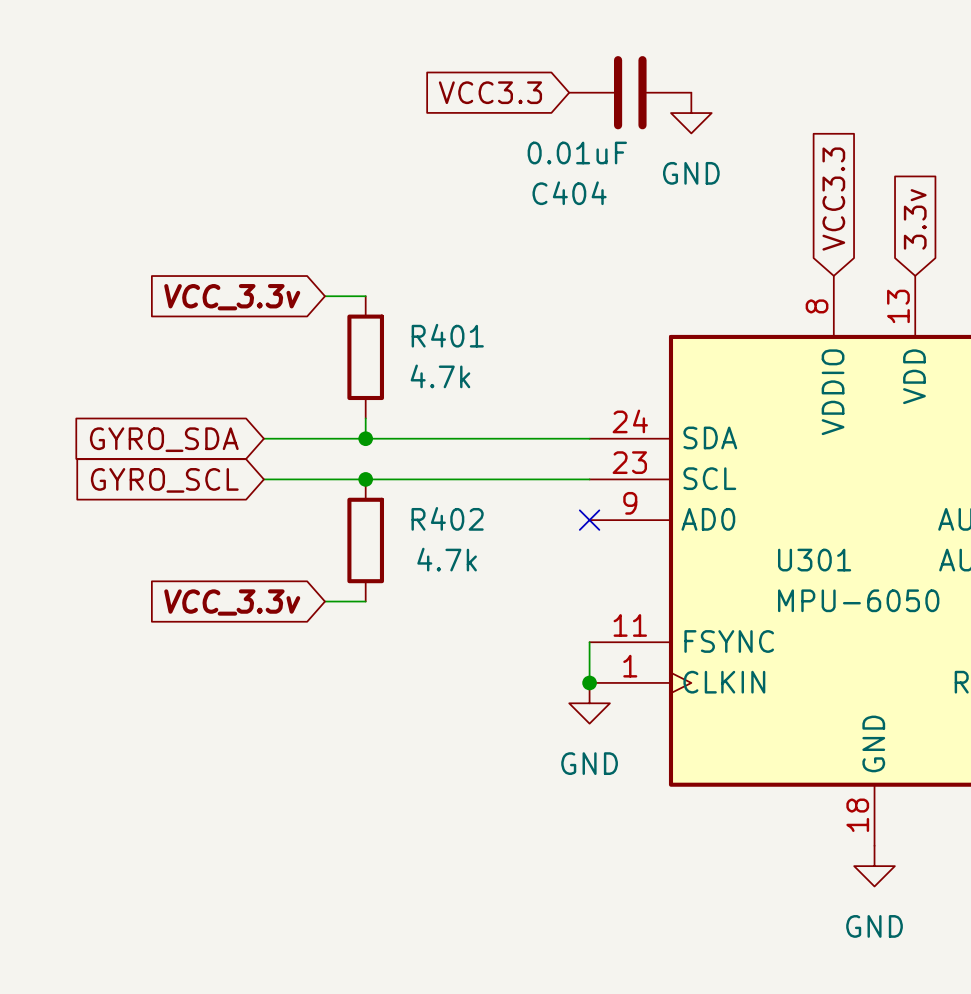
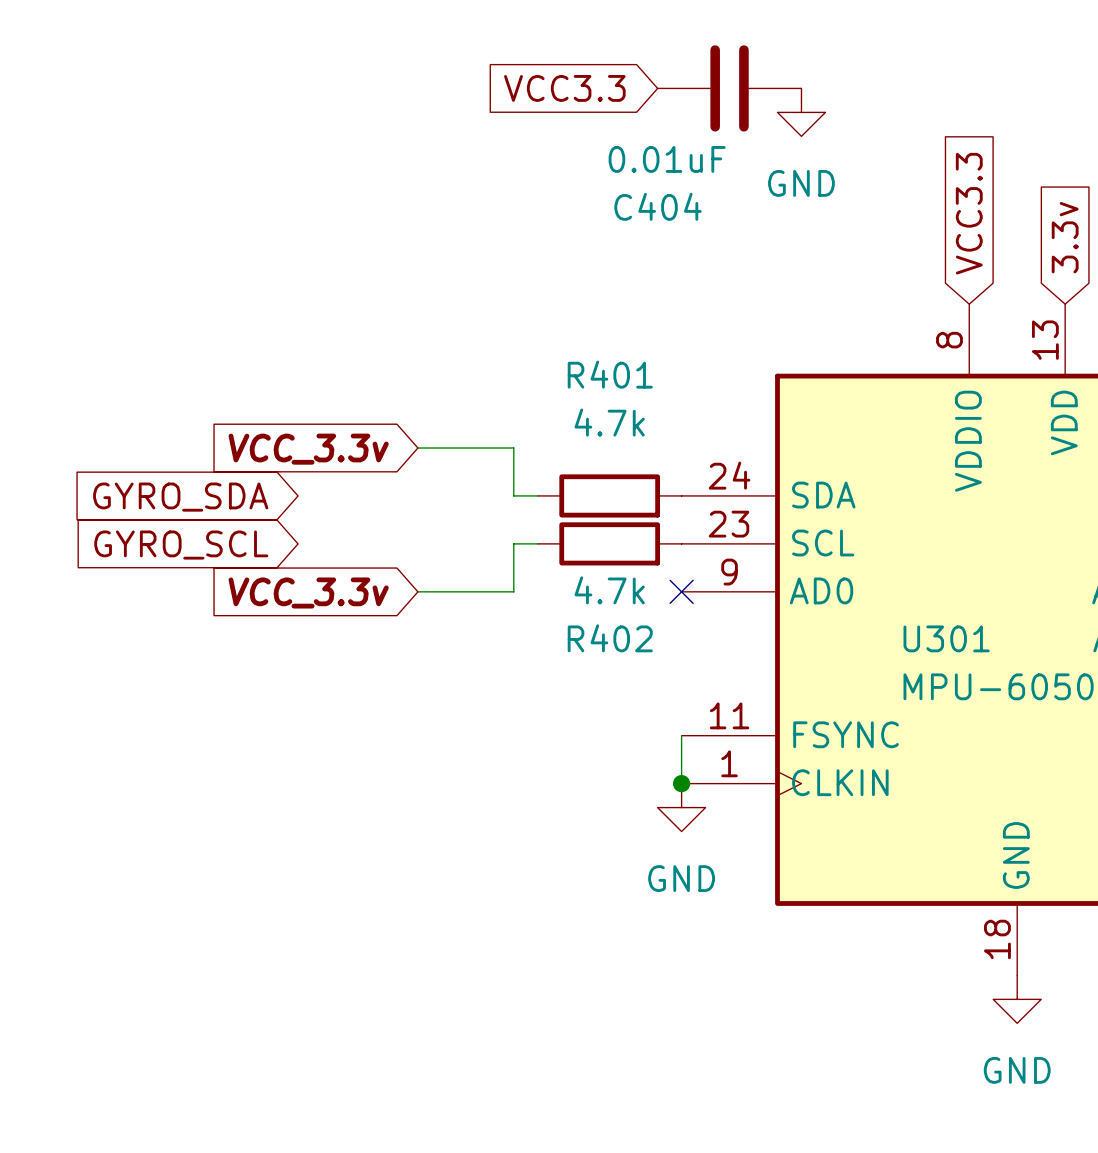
wire: (324, 296) (365, 296) -> none
global label: VCC_3.3v (232, 297) -> none
R401 name position: R401 (447, 335) -> R401 (610, 374)
R401 rotation: 0° (365, 357) -> 90° clockwise (609, 495)
R401 position: (365, 357) -> (609, 495)
R401 value position: 4.7k (440, 376) -> 4.7k (609, 422)
global label: none -> VCC_3.3v (308, 449)
wire: (365, 418) (365, 438) -> none
wire: (263, 438) (447, 438) -> (417, 448) (513, 448) (513, 495)
junction: (365, 438) -> none
wire: (467, 438) (589, 438) -> none
wire: (263, 479) (447, 479) -> (417, 591) (513, 591) (513, 543)
junction: (365, 479) -> none
wire: (467, 479) (589, 479) -> none
R402 rotation: 0° (365, 540) -> 90° clockwise (609, 543)
R402 position: (365, 540) -> (609, 543)
R402 value position: 4.7k (447, 559) -> 4.7k (609, 590)
wire: (324, 601) (365, 601) -> none
global label position: VCC_3.3v (232, 602) -> VCC_3.3v (308, 592)

